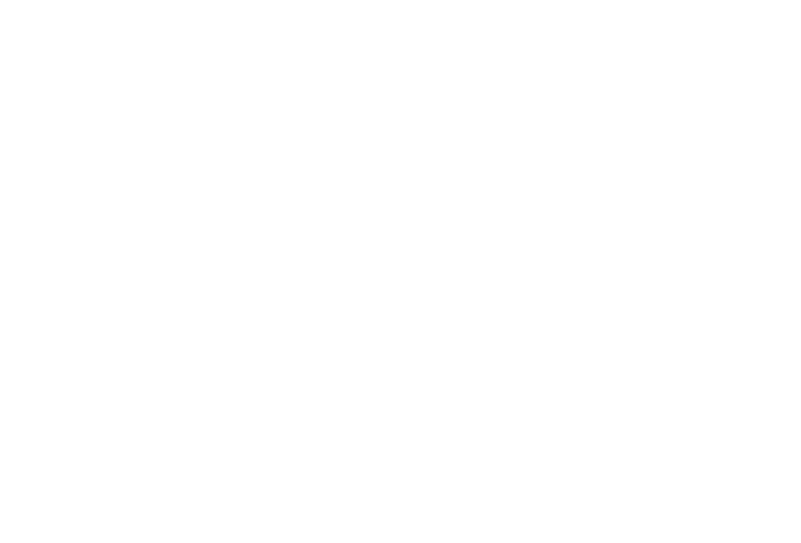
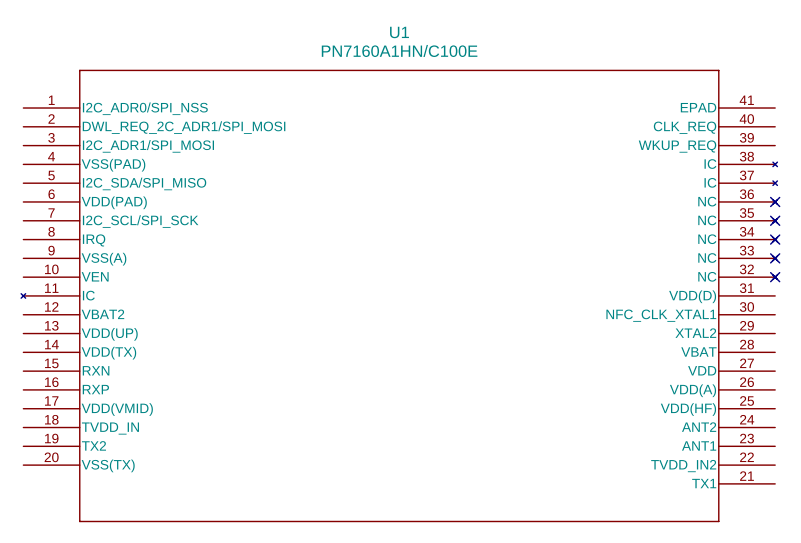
no-connect mark: none -> (775, 201)
no-connect mark: none -> (775, 220)
no-connect mark: none -> (775, 239)
no-connect mark: none -> (775, 258)
no-connect mark: none -> (775, 277)
U1: none -> PN7160A1HN/C100E (399, 295)

